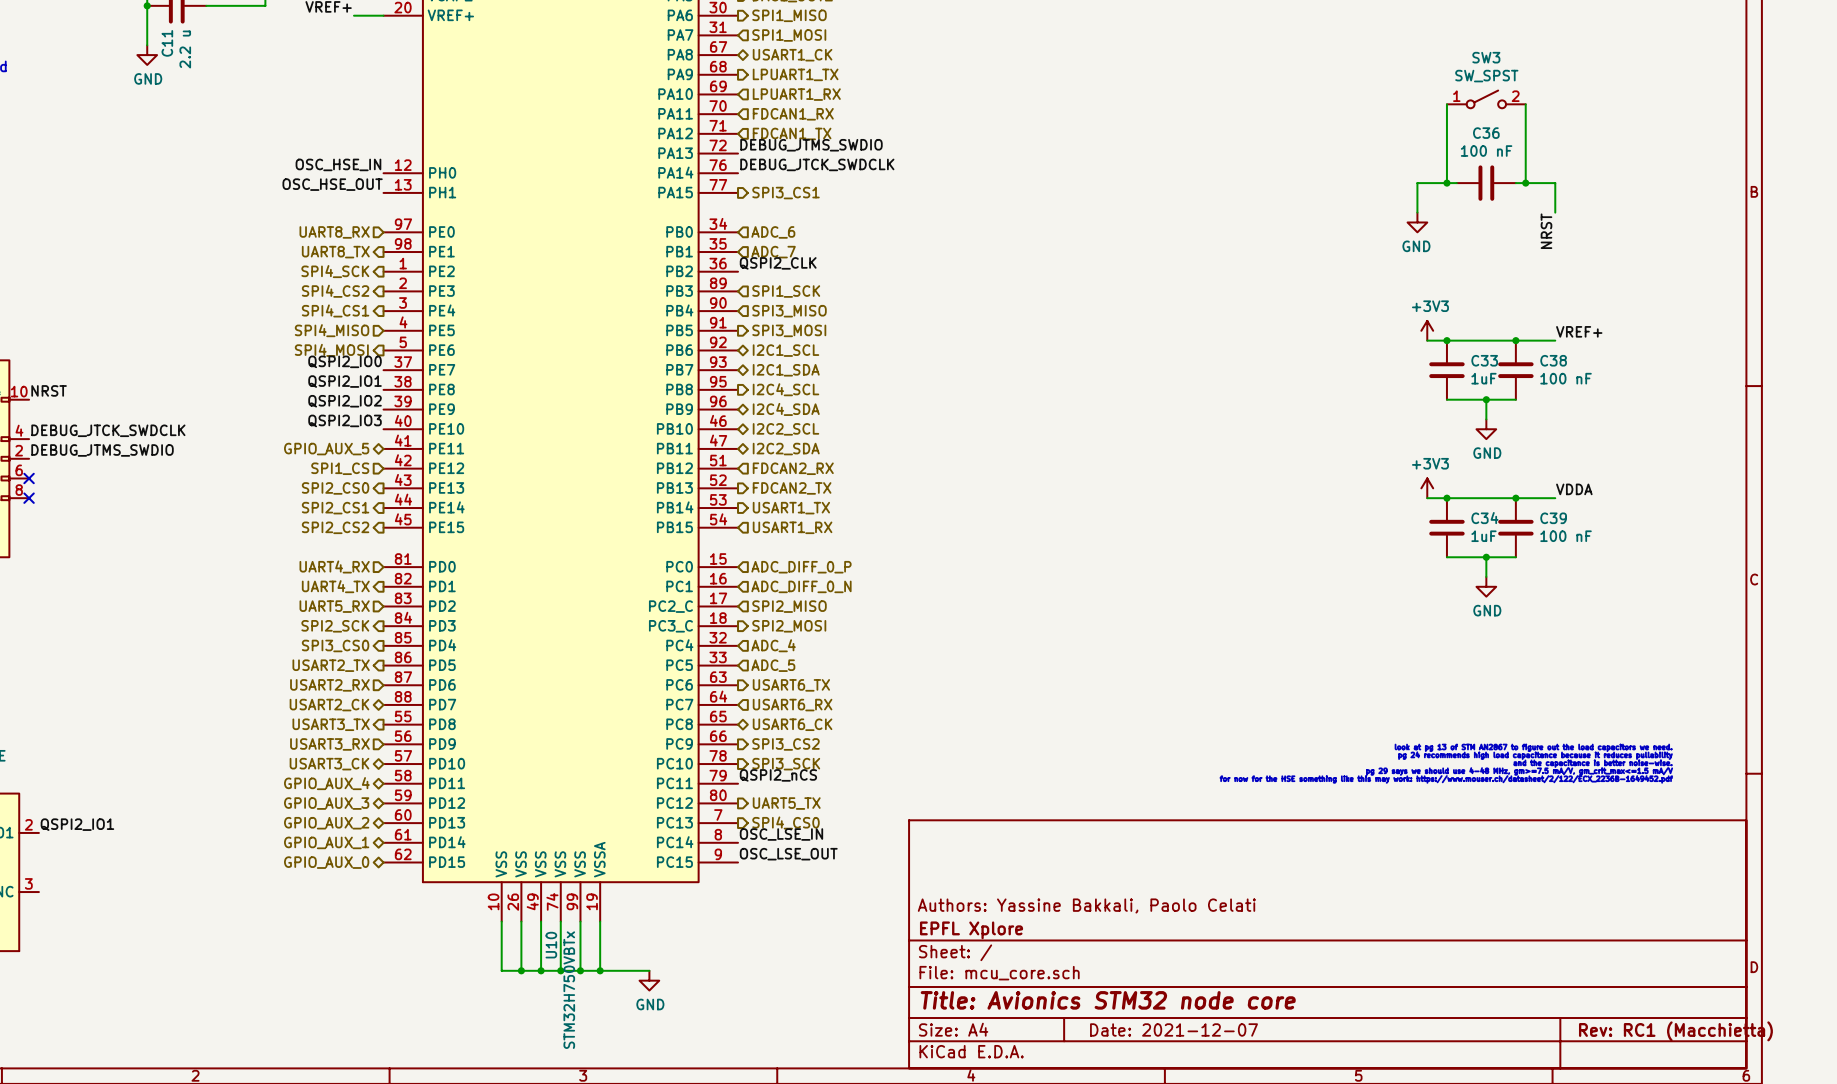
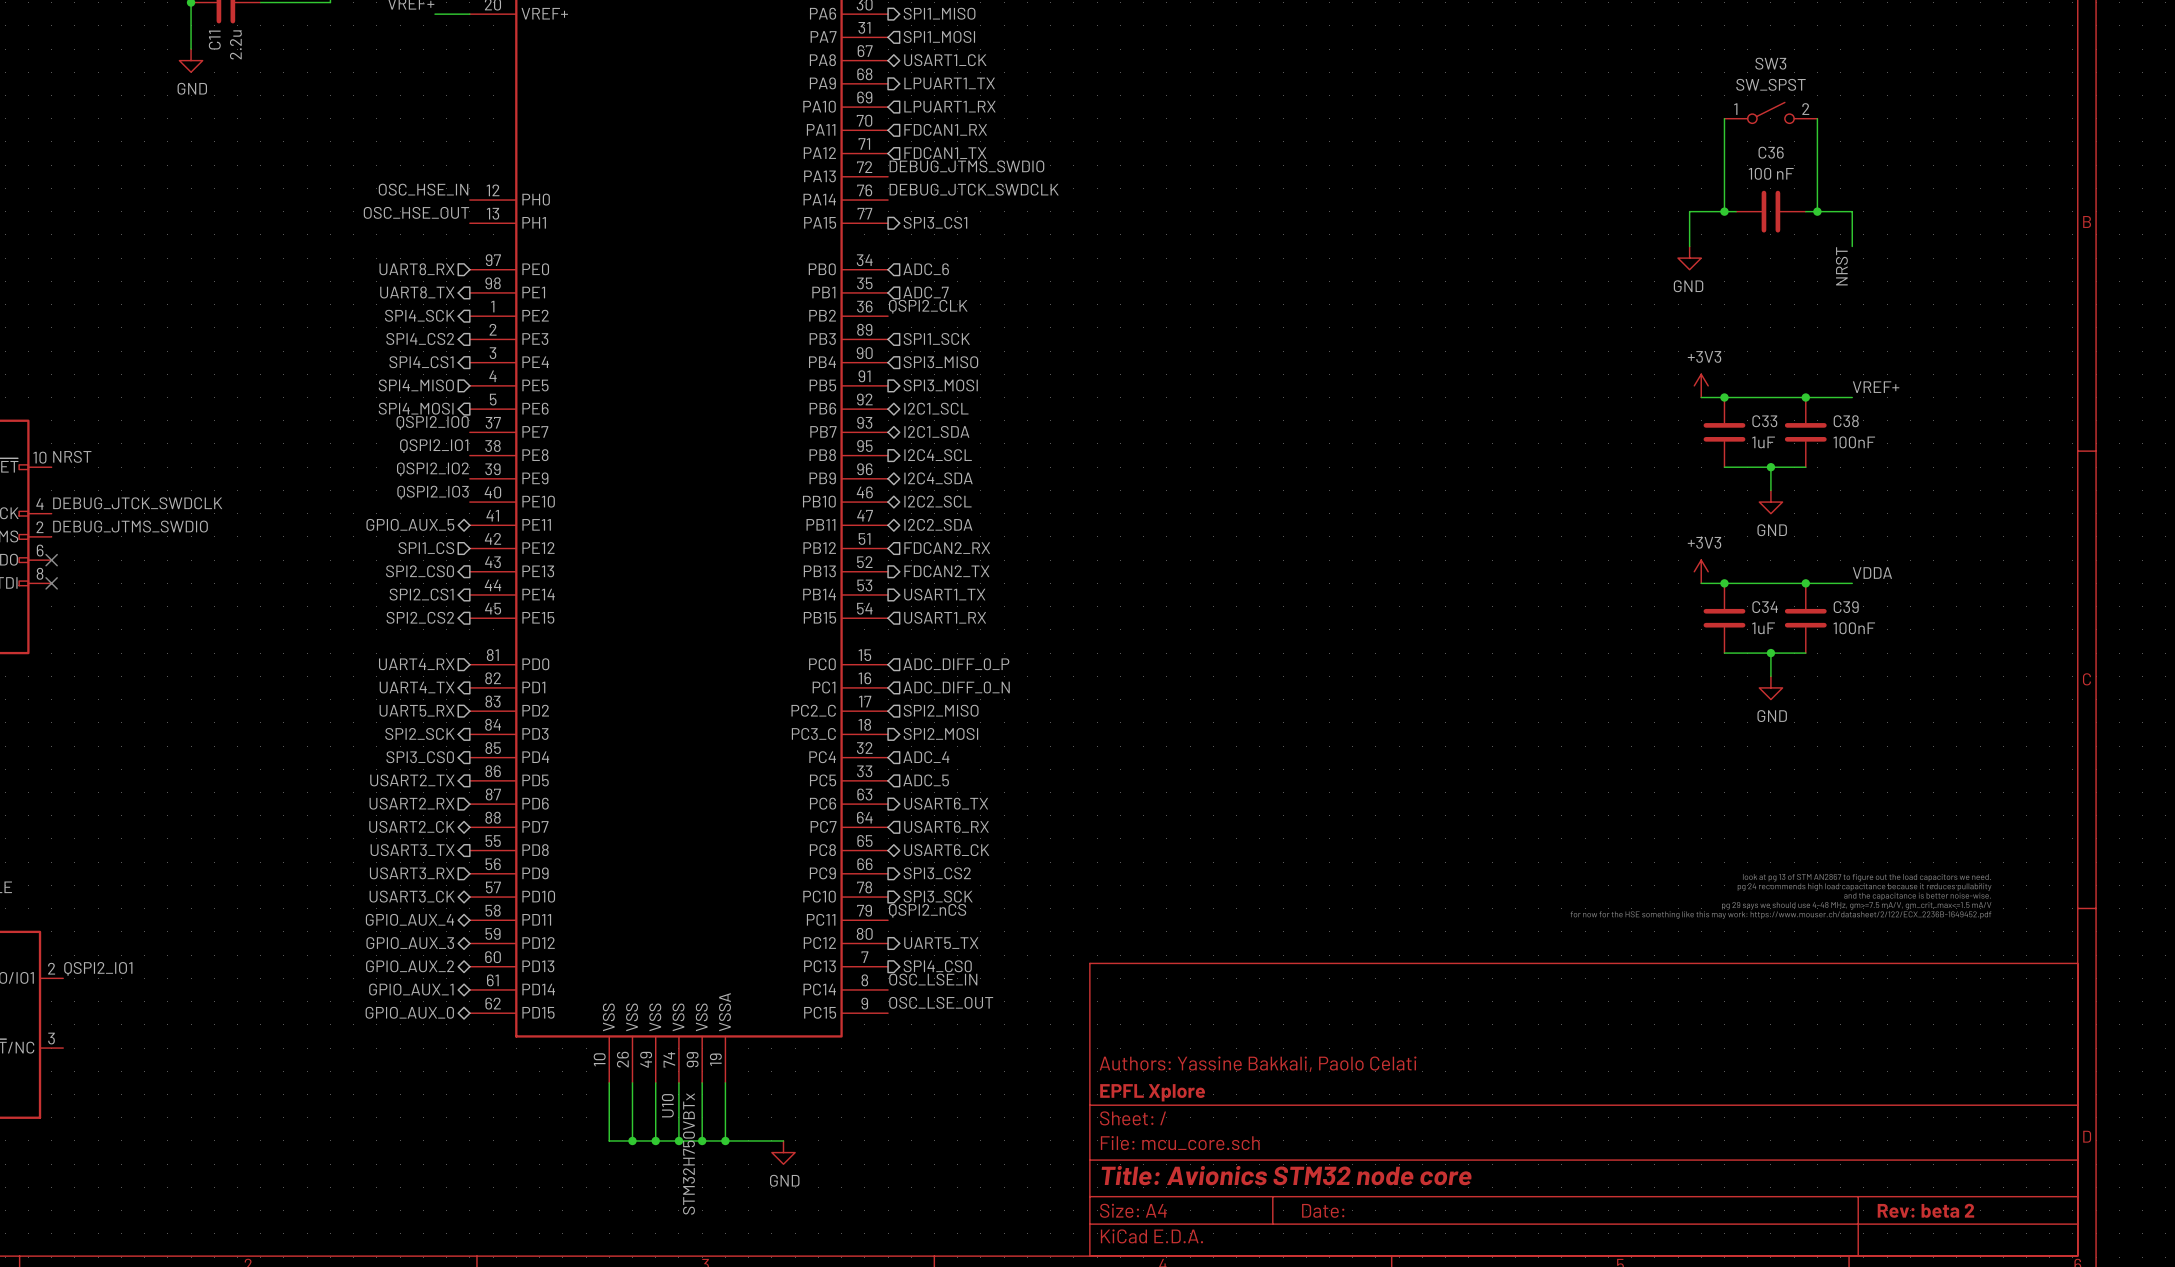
C11 value: 2.2 u (185, 49) -> 2.2u (235, 44)
C38 value: 100 nF (1566, 378) -> 100nF (1854, 442)
C39 value: 100 nF (1566, 536) -> 100nF (1854, 628)
title block: Date: 2021-12-07 (1174, 1029) -> Date: (1323, 1210)
title block: Rev: RC1 (Macchietta) (1675, 1031) -> Rev: beta 2 (1925, 1210)

